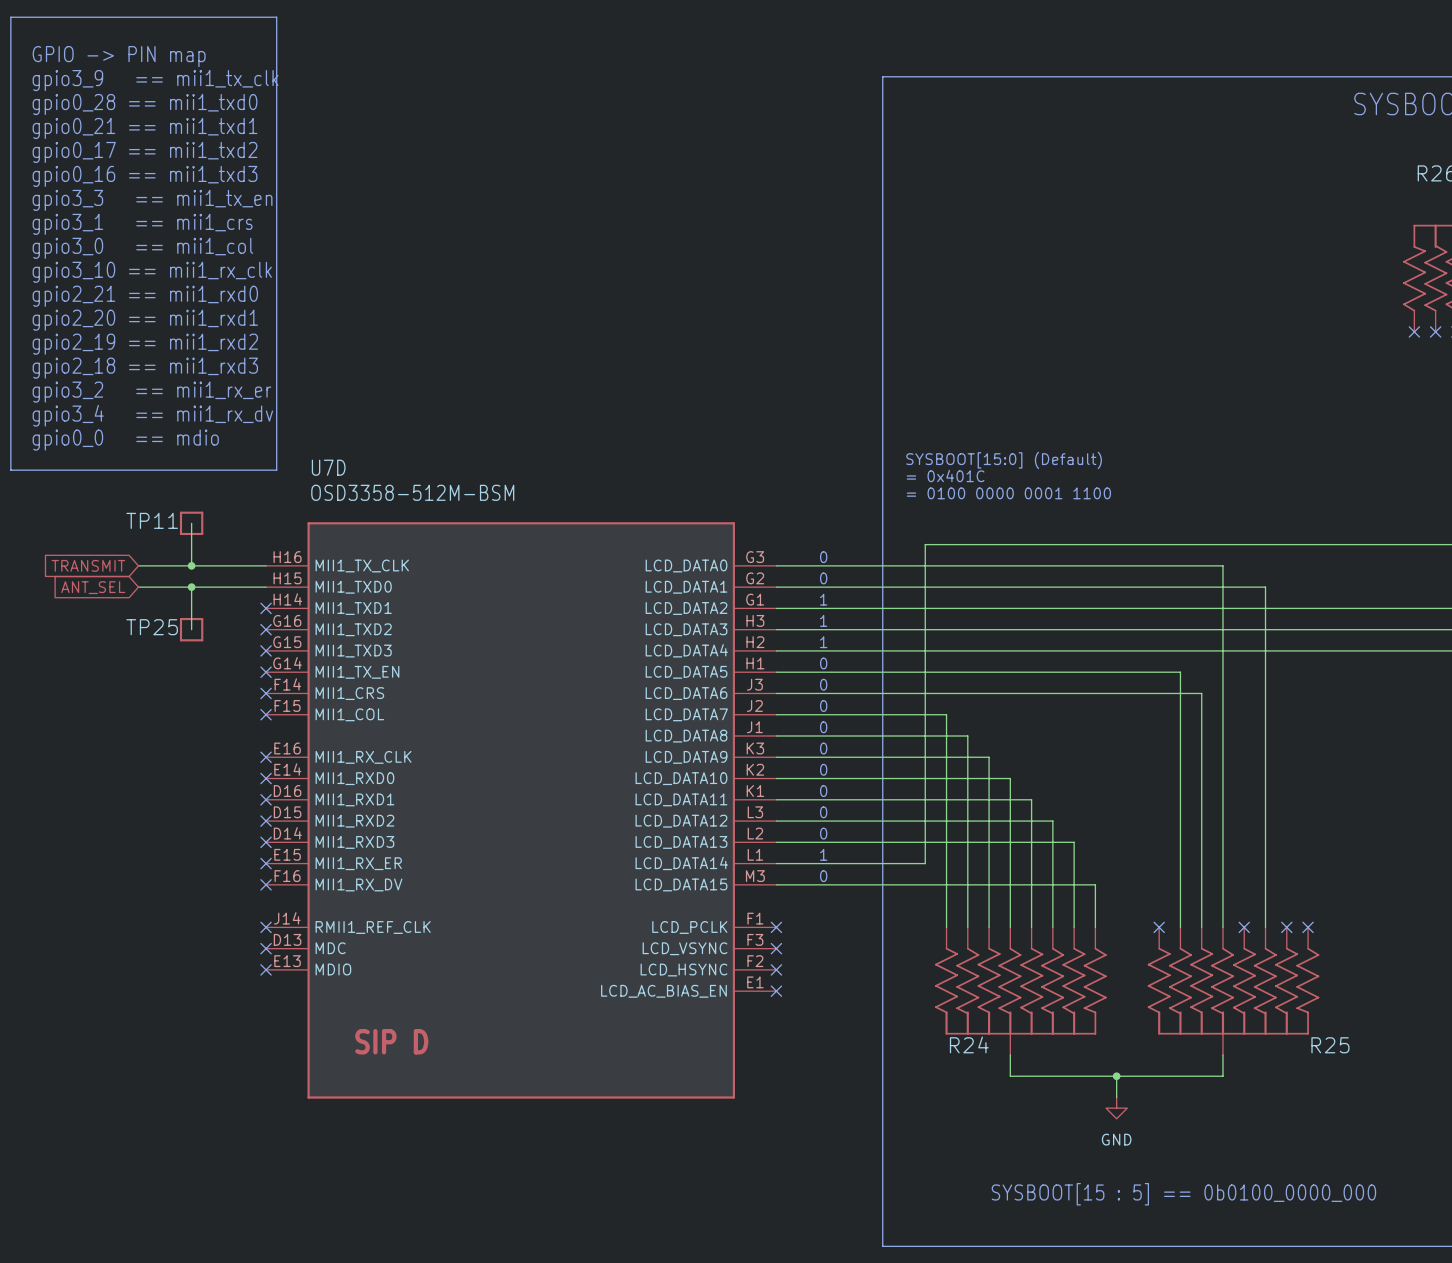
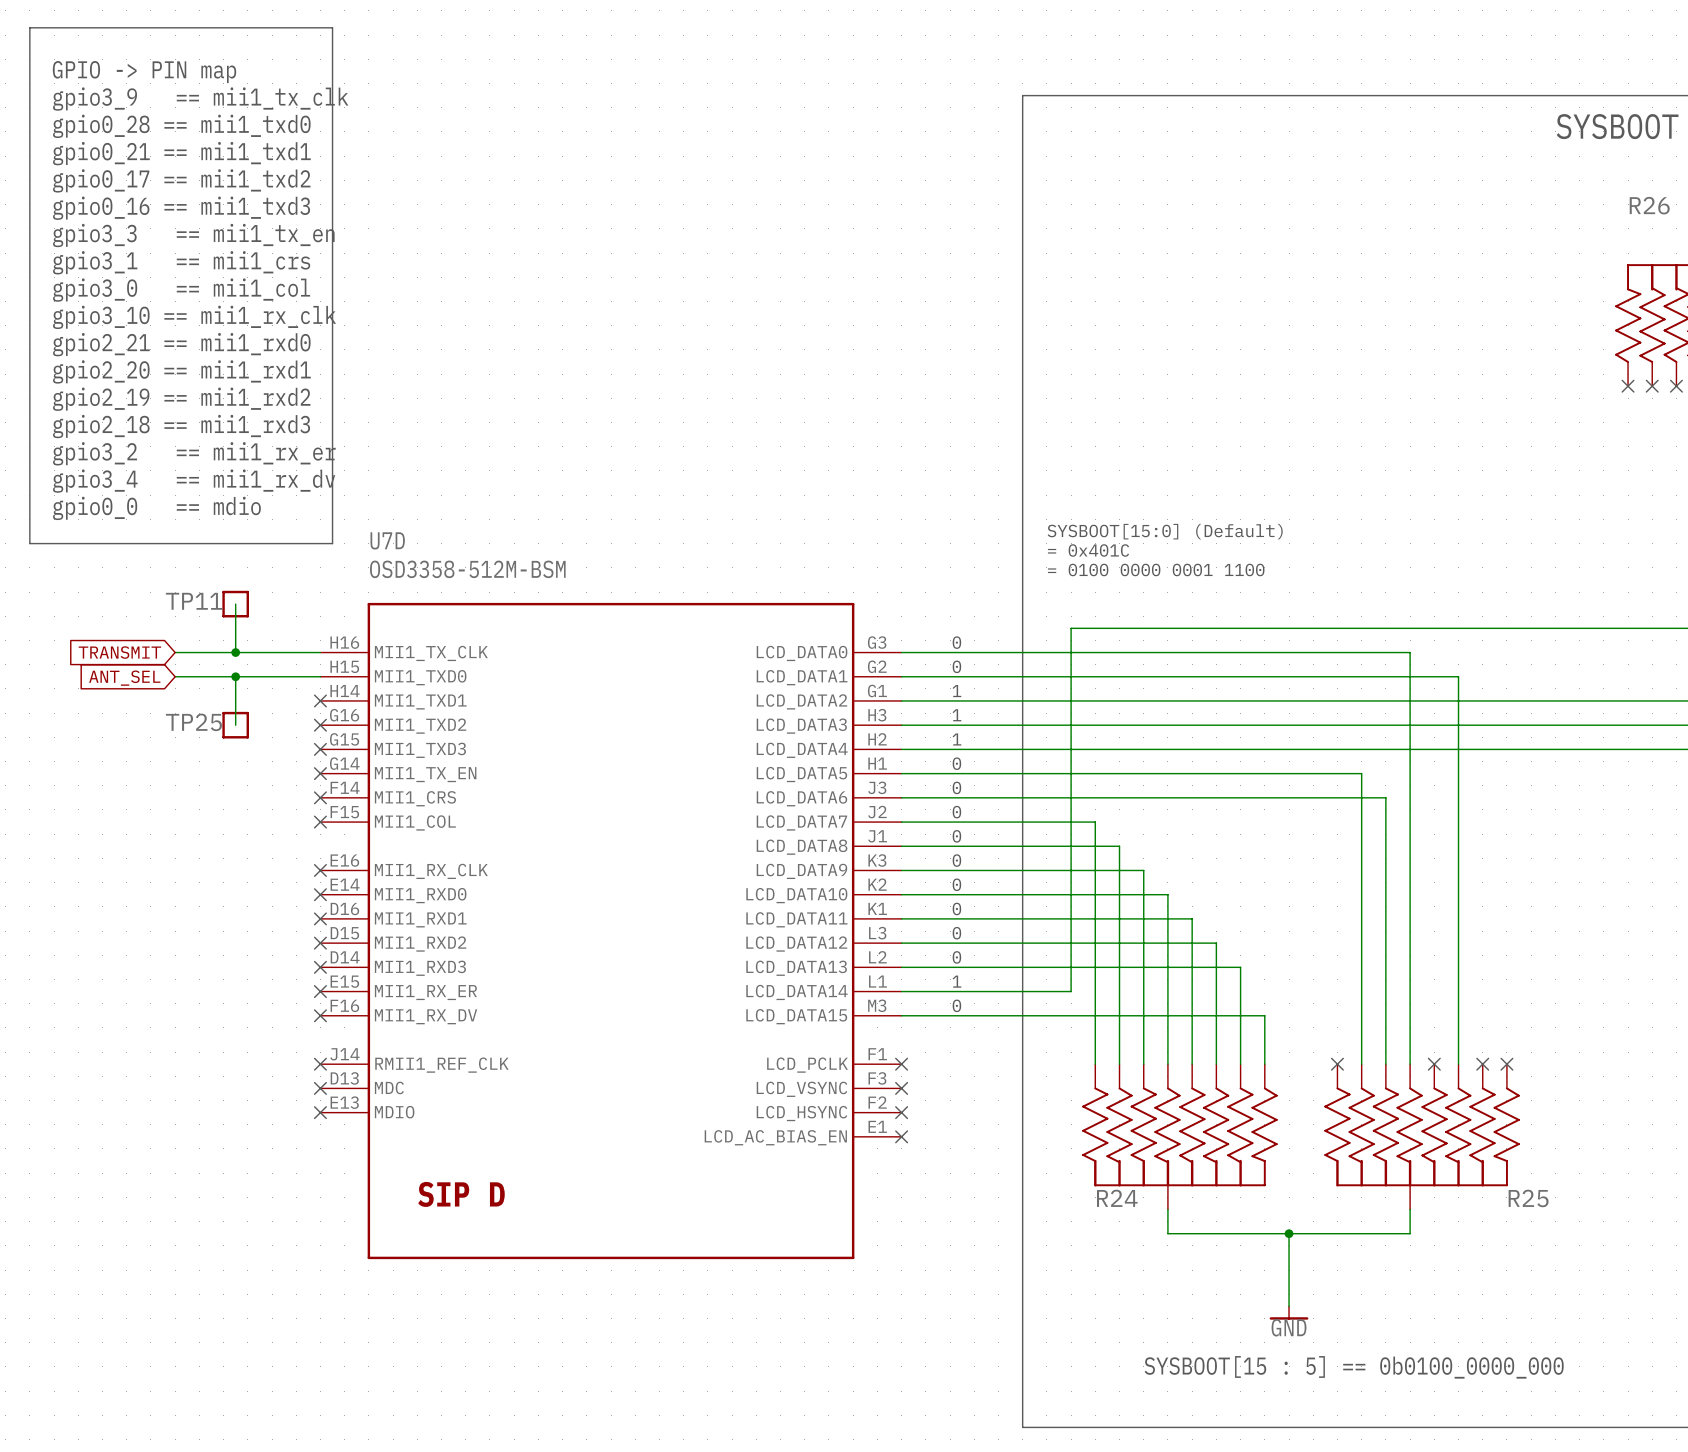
wire: none -> (1289, 1257) (1289, 1306)
power symbol: GND (1116, 1108) -> none
power symbol: none -> GND (1289, 1313)

